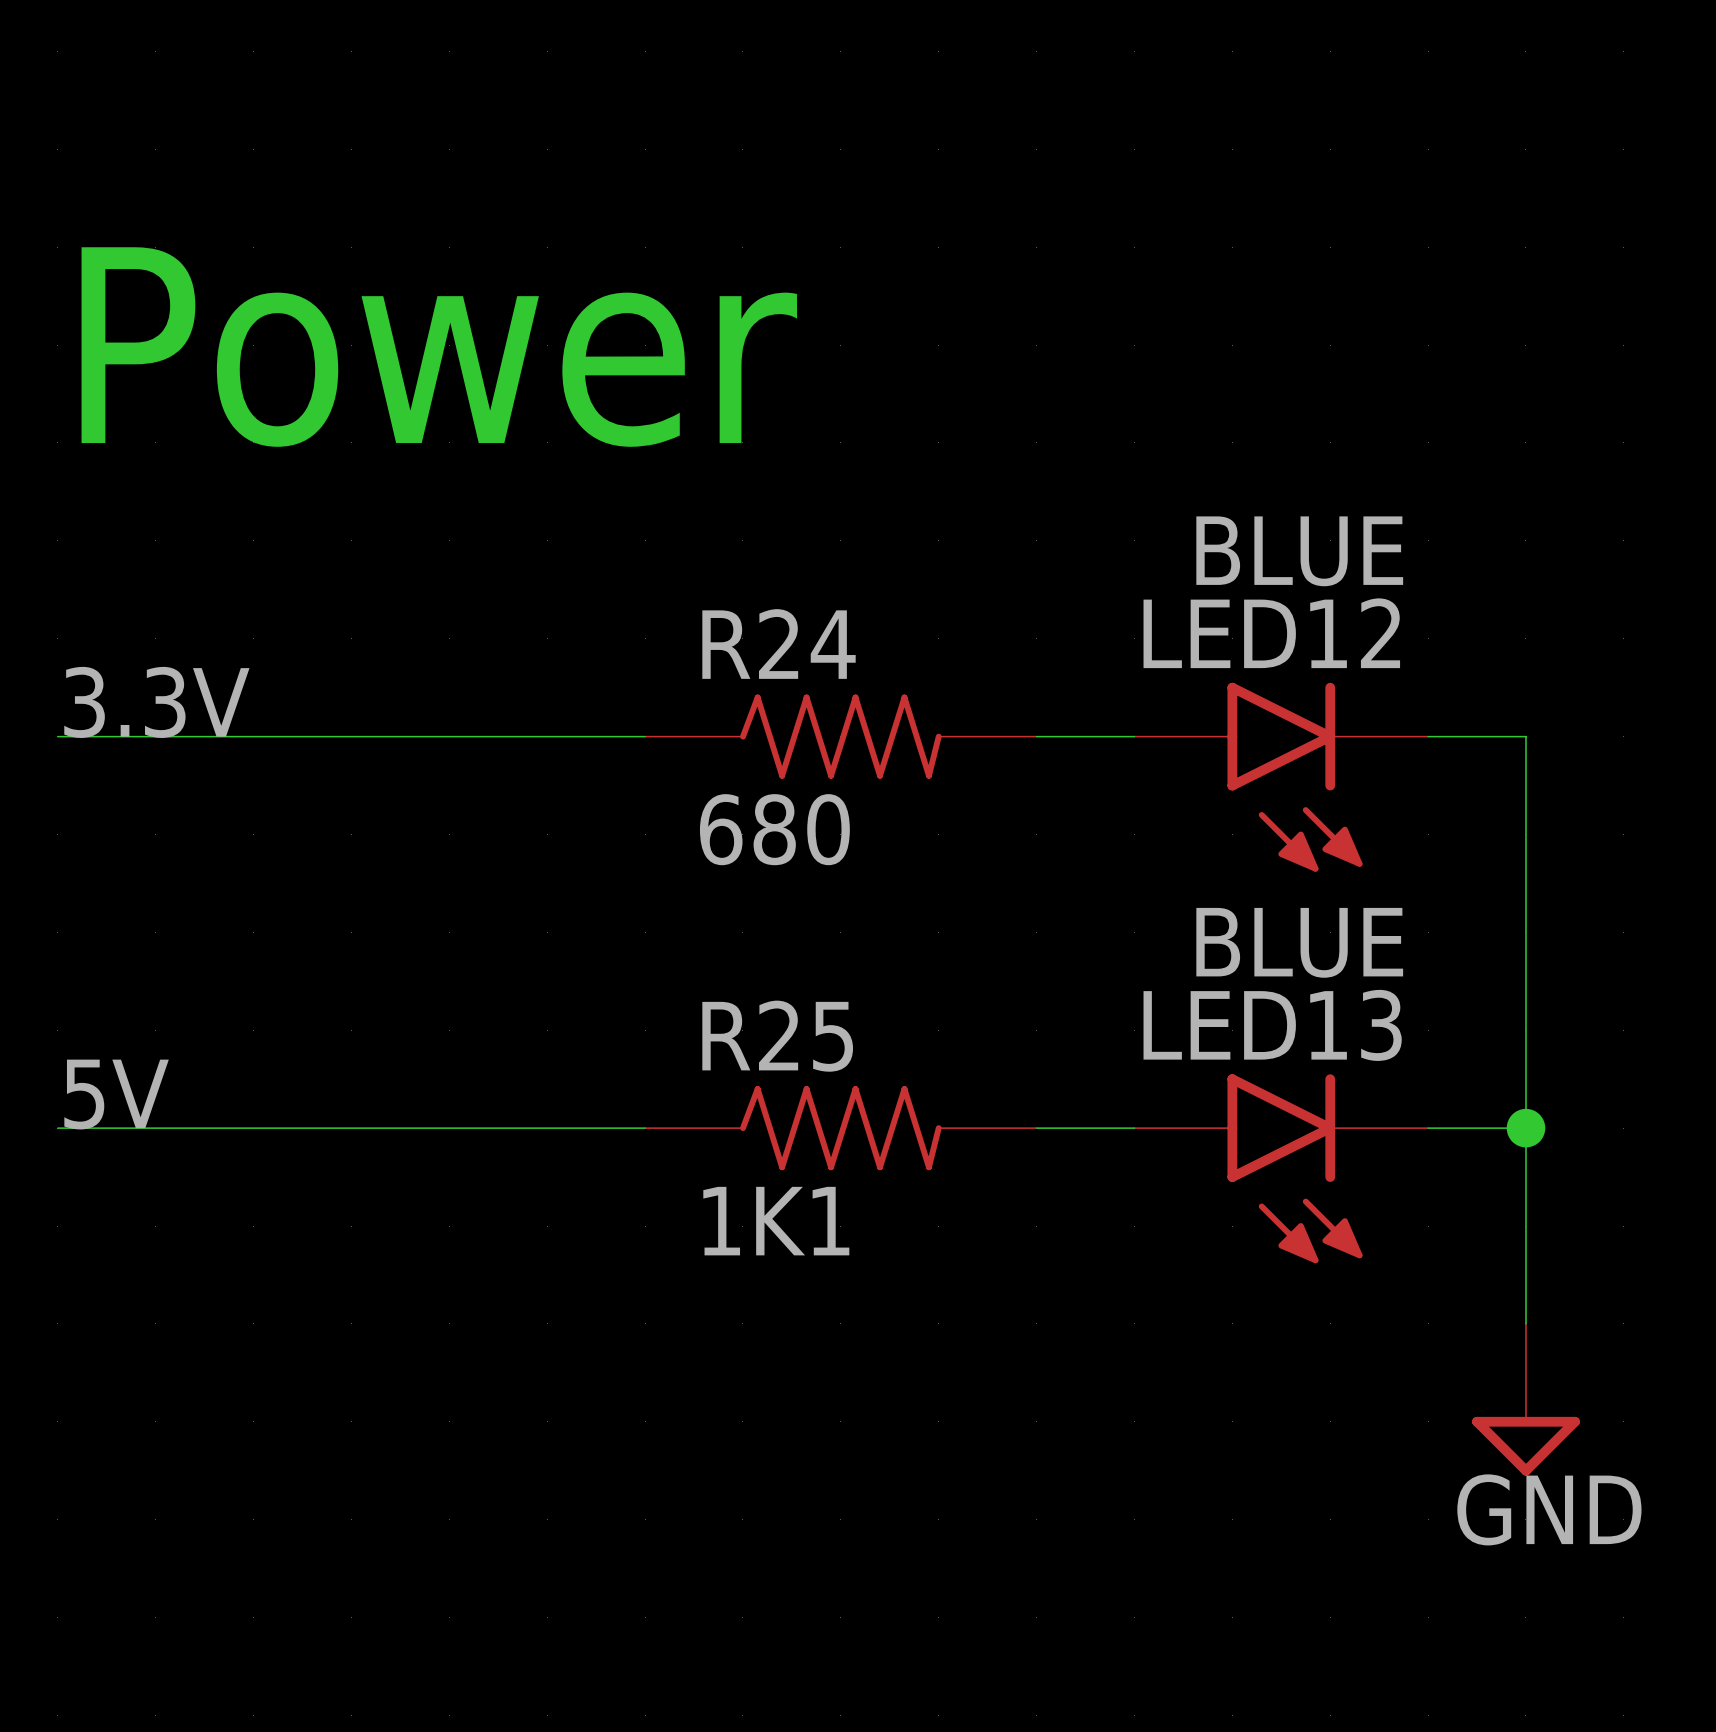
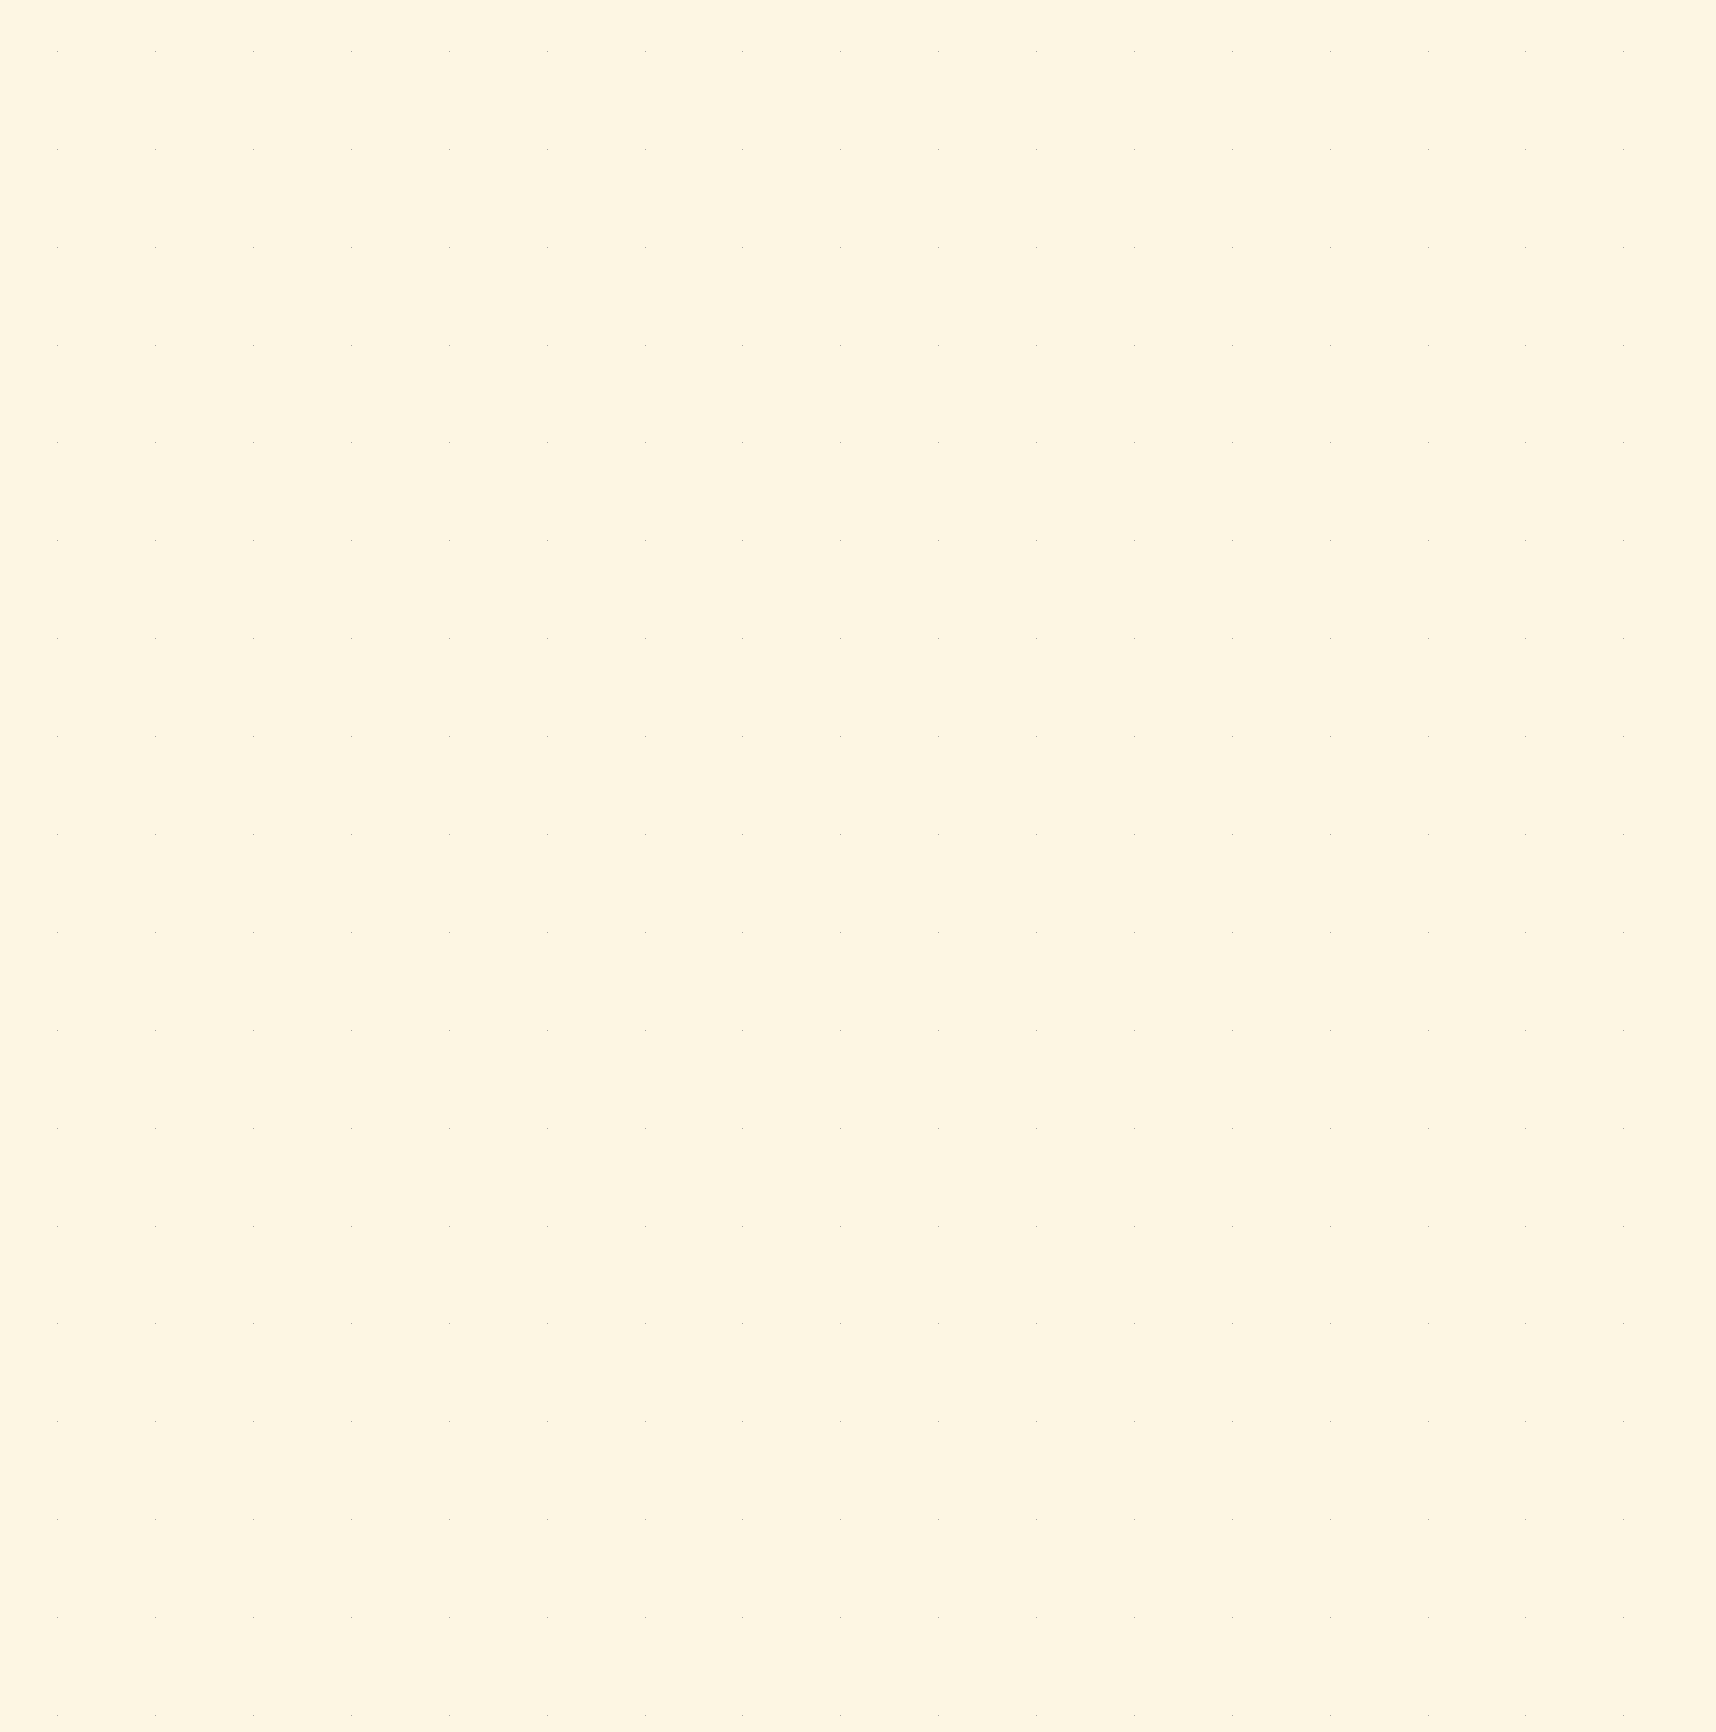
text: Power (439, 347) -> none
label: 3.3V (156, 702) -> none
wire: (57, 736) (645, 736) -> none
R24: 680 (840, 736) -> none
wire: (1036, 736) (1134, 736) -> none
wire: (1428, 736) (1525, 736) (1525, 1323) -> none
LED12: BLUE (1281, 777) -> none
label: 5V (116, 1094) -> none
wire: (57, 1128) (645, 1128) -> none
R25: 1K1 (840, 1128) -> none
wire: (1036, 1128) (1134, 1128) -> none
wire: (1428, 1128) (1525, 1128) -> none
junction: (1525, 1128) -> none
LED13: BLUE (1281, 1168) -> none
power symbol: GND (1525, 1399) -> none

